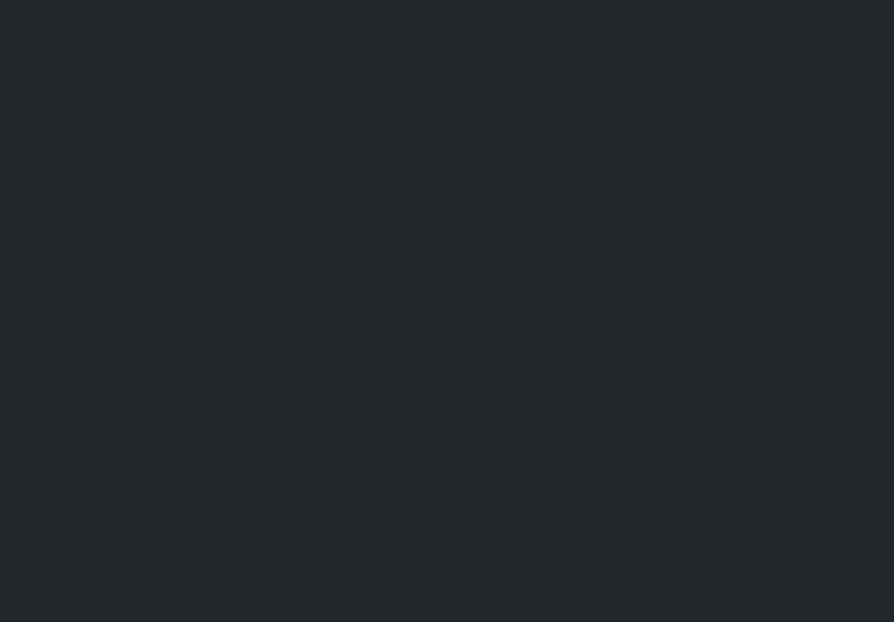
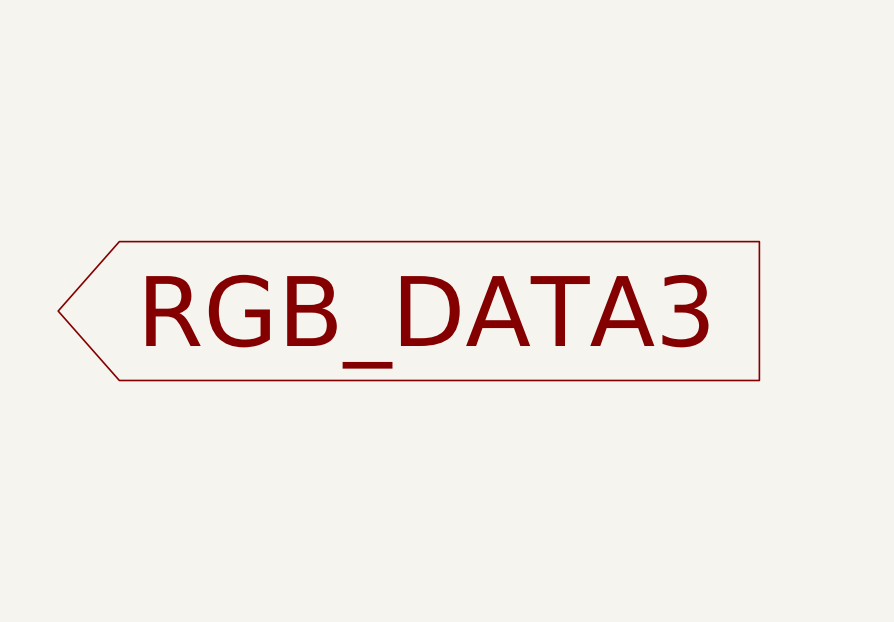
global label: none -> RGB_DATA3 (427, 321)

